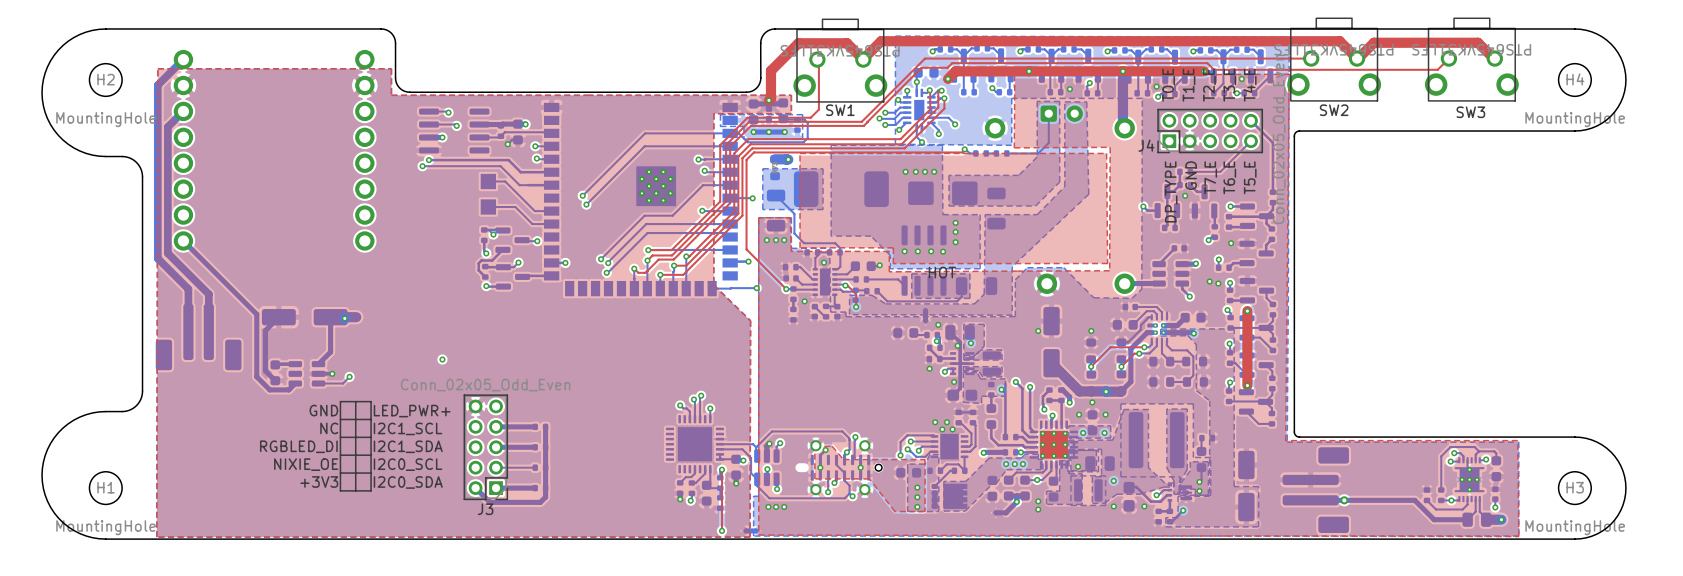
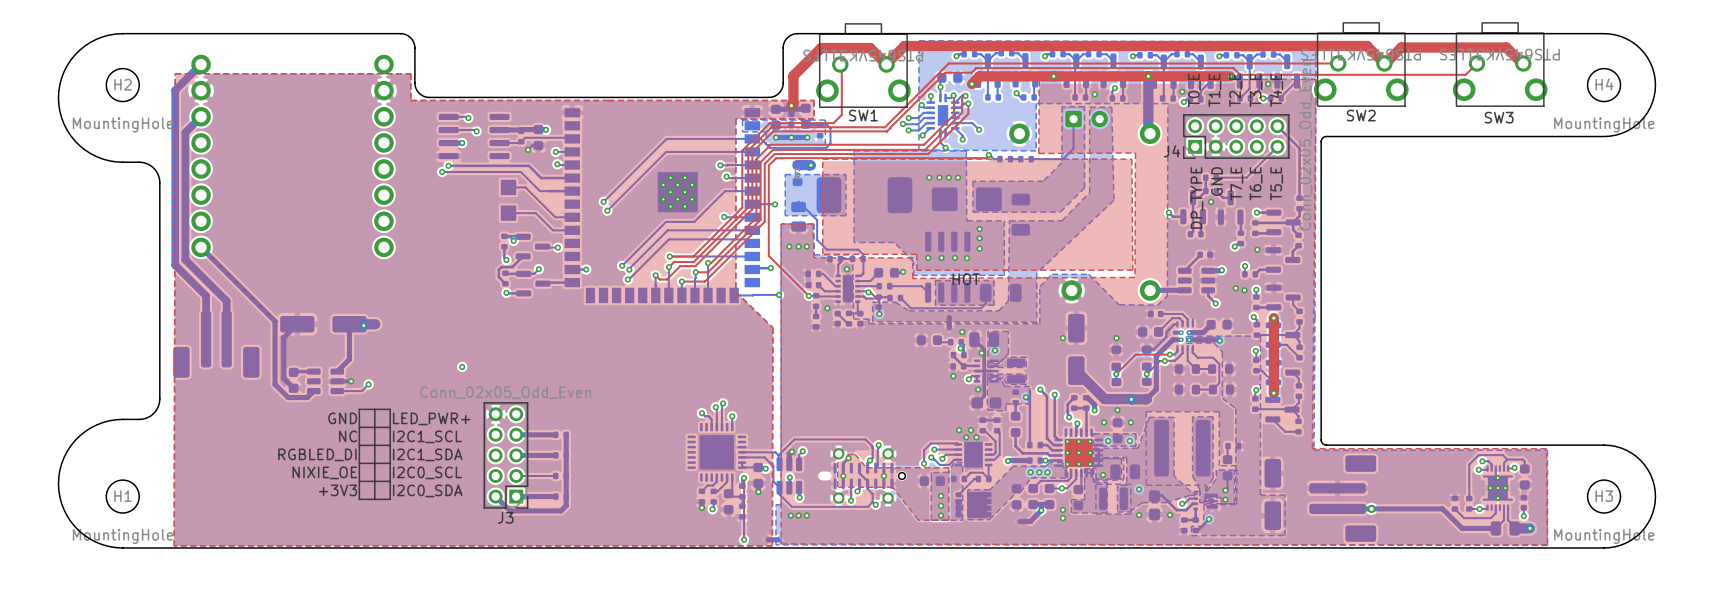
part footprint: [766, 189, 786, 232] -> [791, 201, 807, 232]

